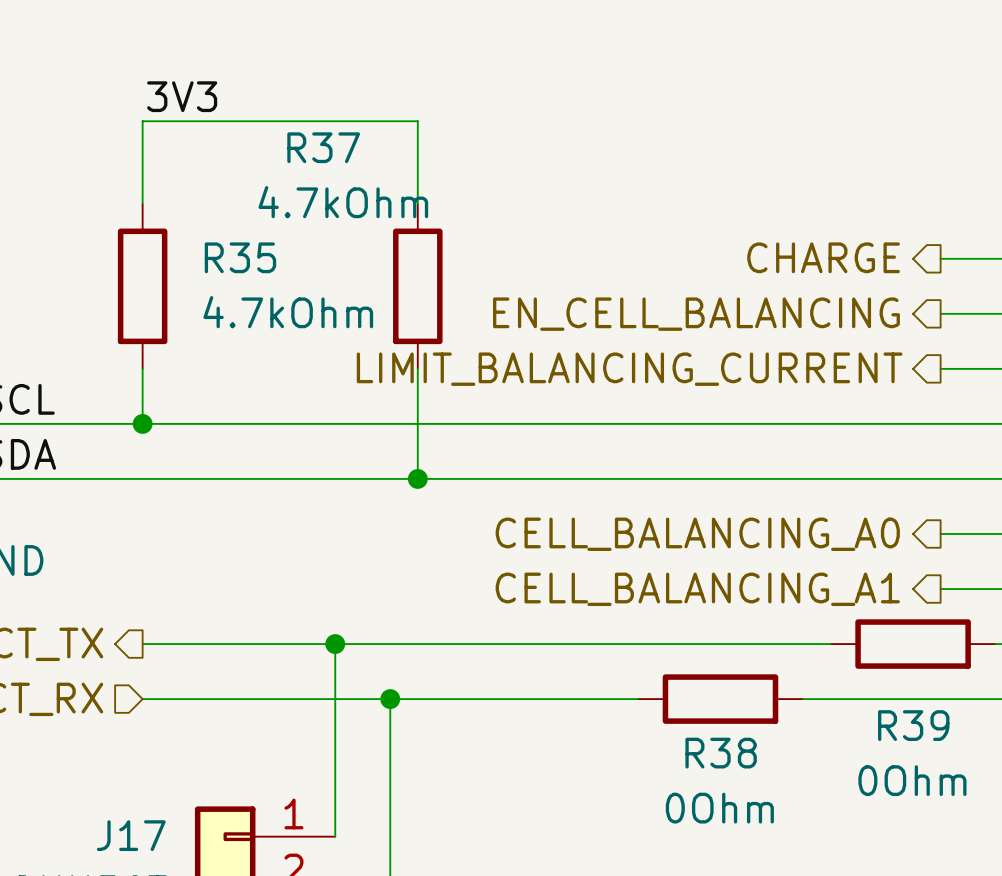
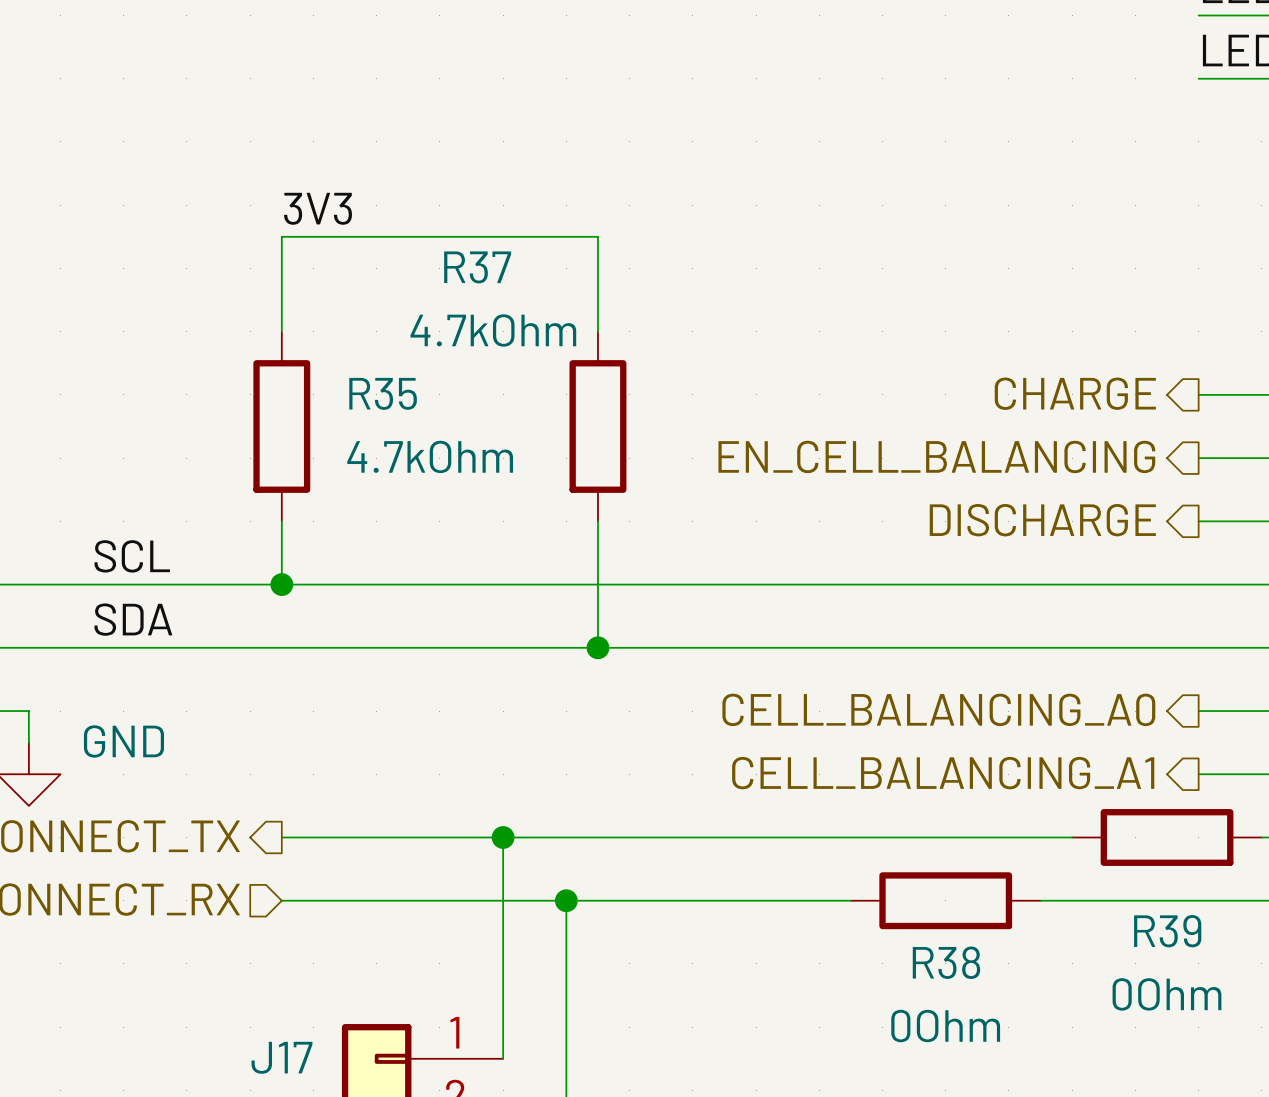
hierarchical label: LIMIT_BALANCING_CURRENT (629, 369) -> DISCHARGE (1042, 520)

